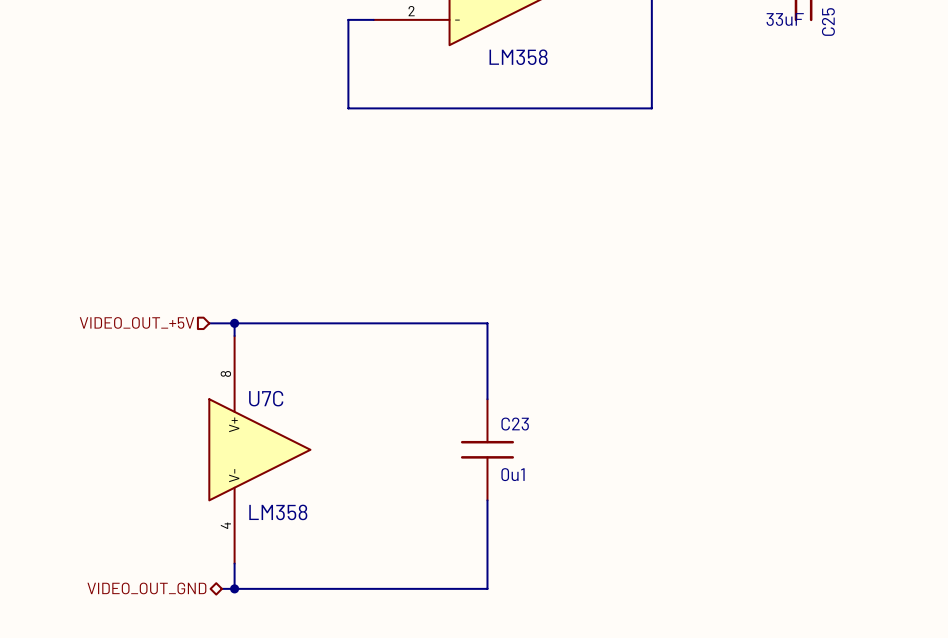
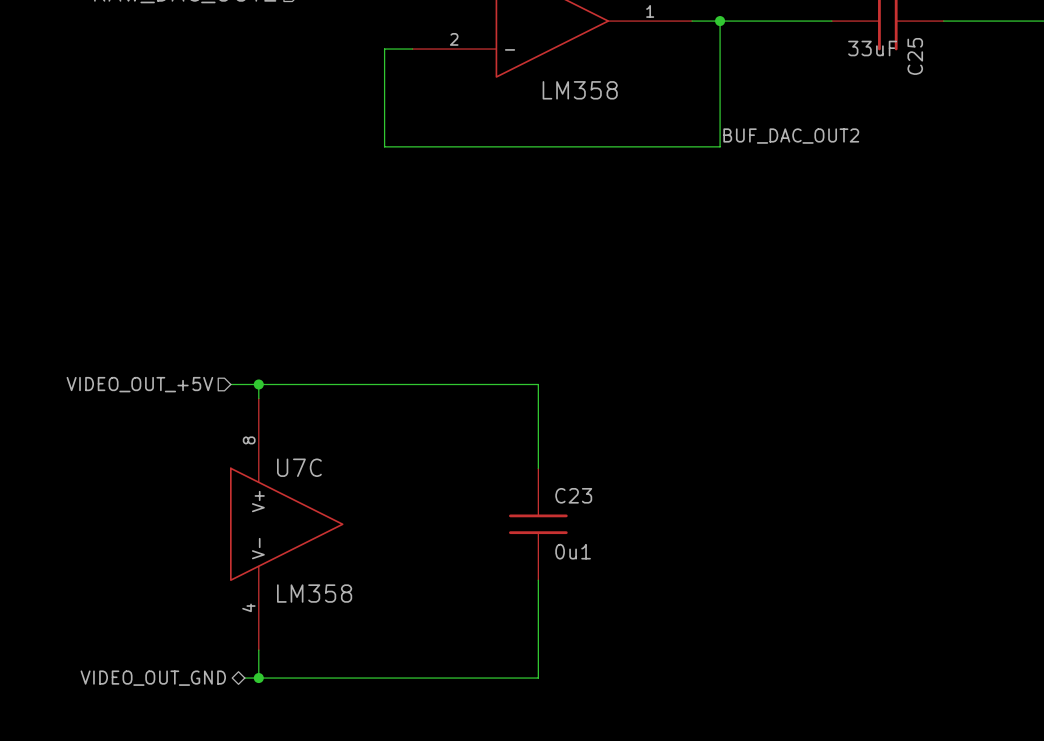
label: none -> BUF_DAC_OUT2 (791, 136)

